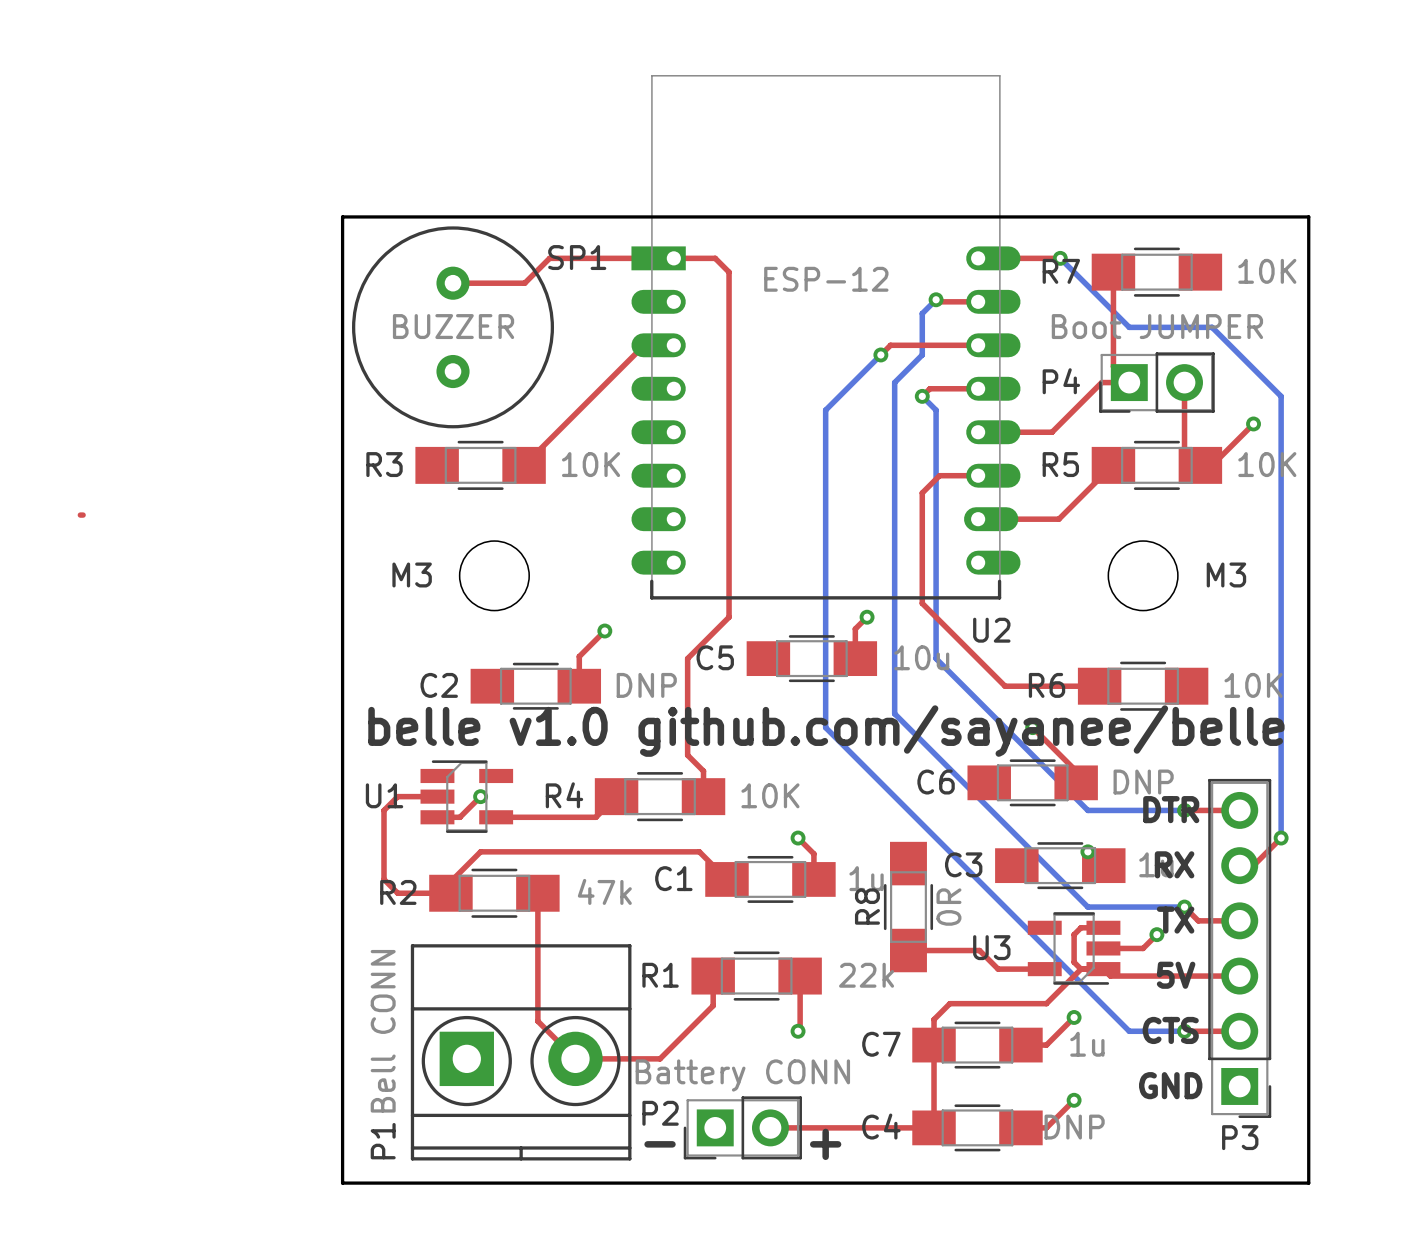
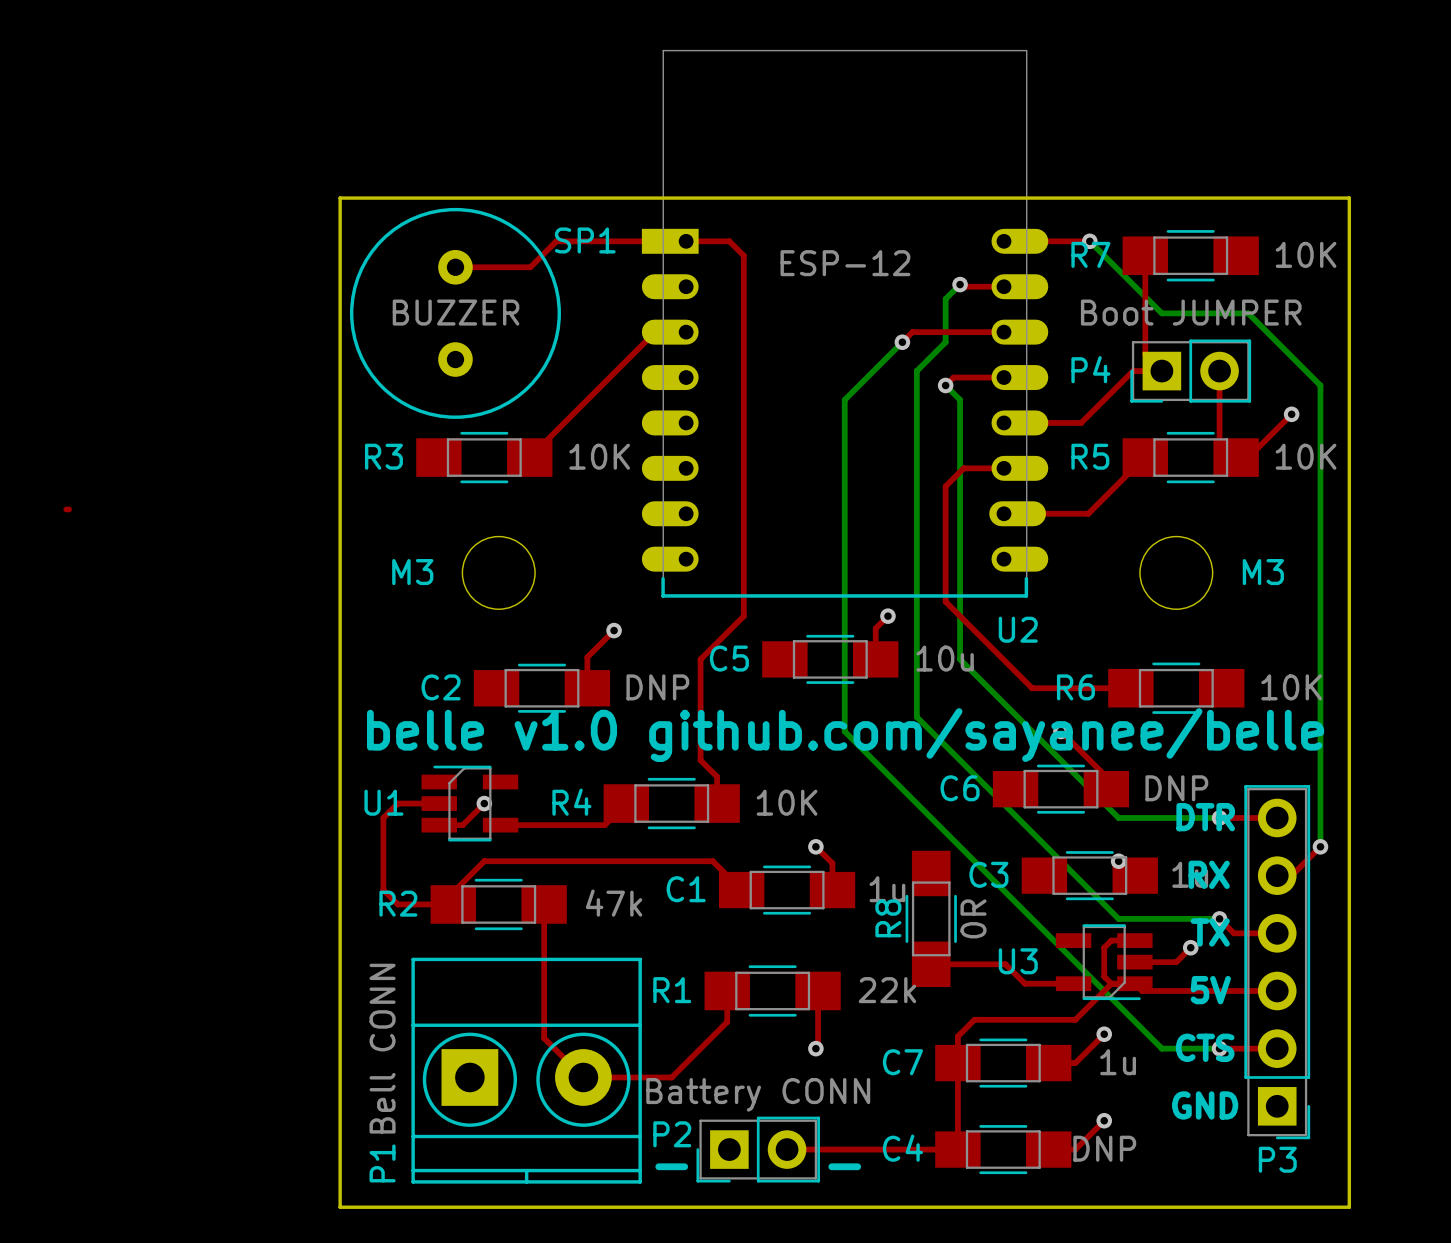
text: + (825, 1144) -> - (844, 1166)

